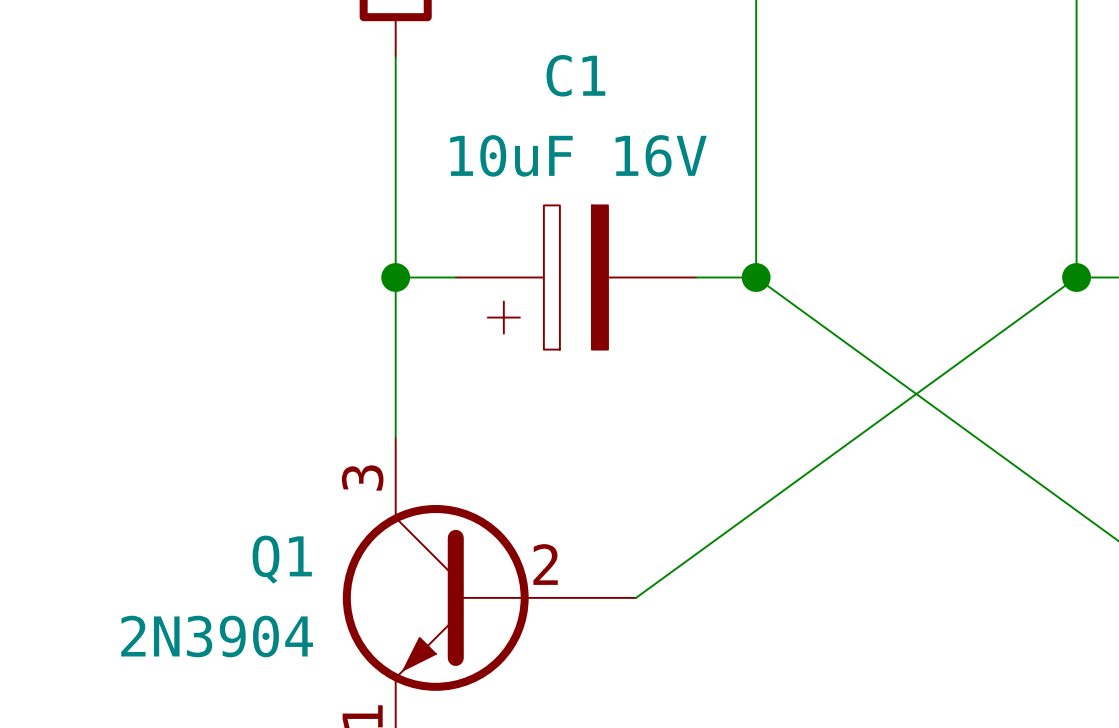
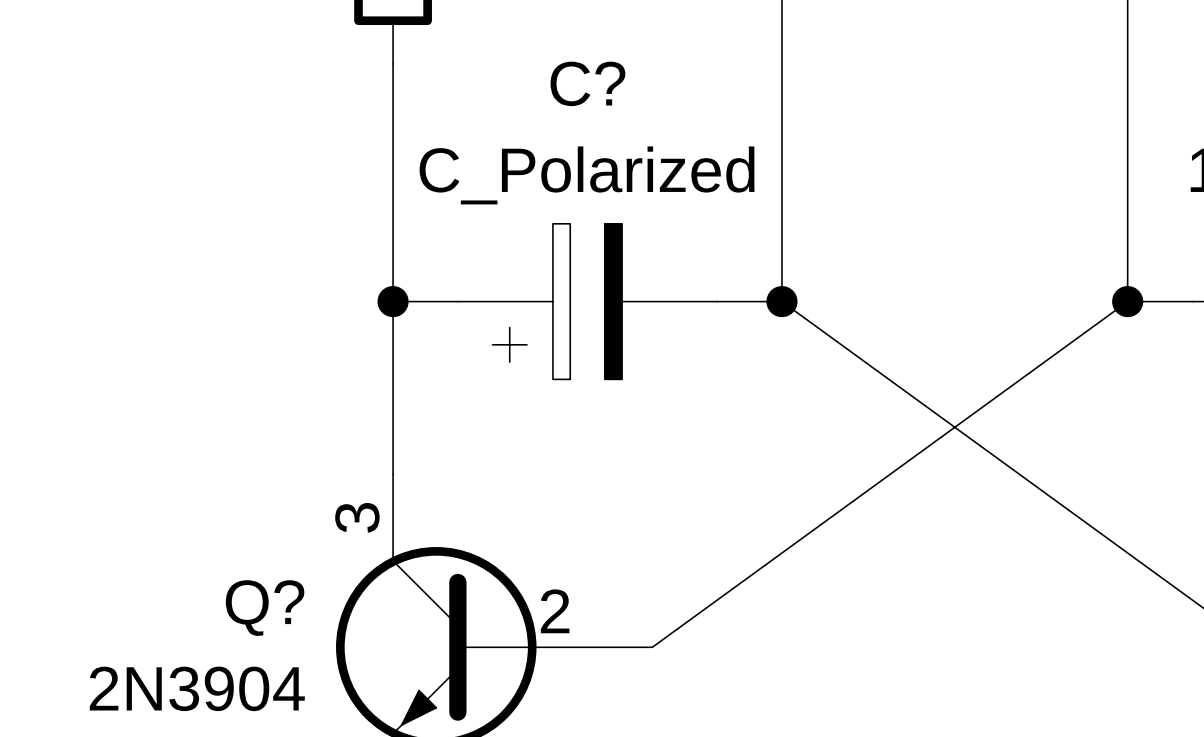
C1 name: C1 (575, 75) -> C? (587, 83)
C1 value: 10uF 16V (578, 155) -> C_Polarized (587, 175)
Q1 name: Q1 (282, 559) -> Q? (265, 608)

